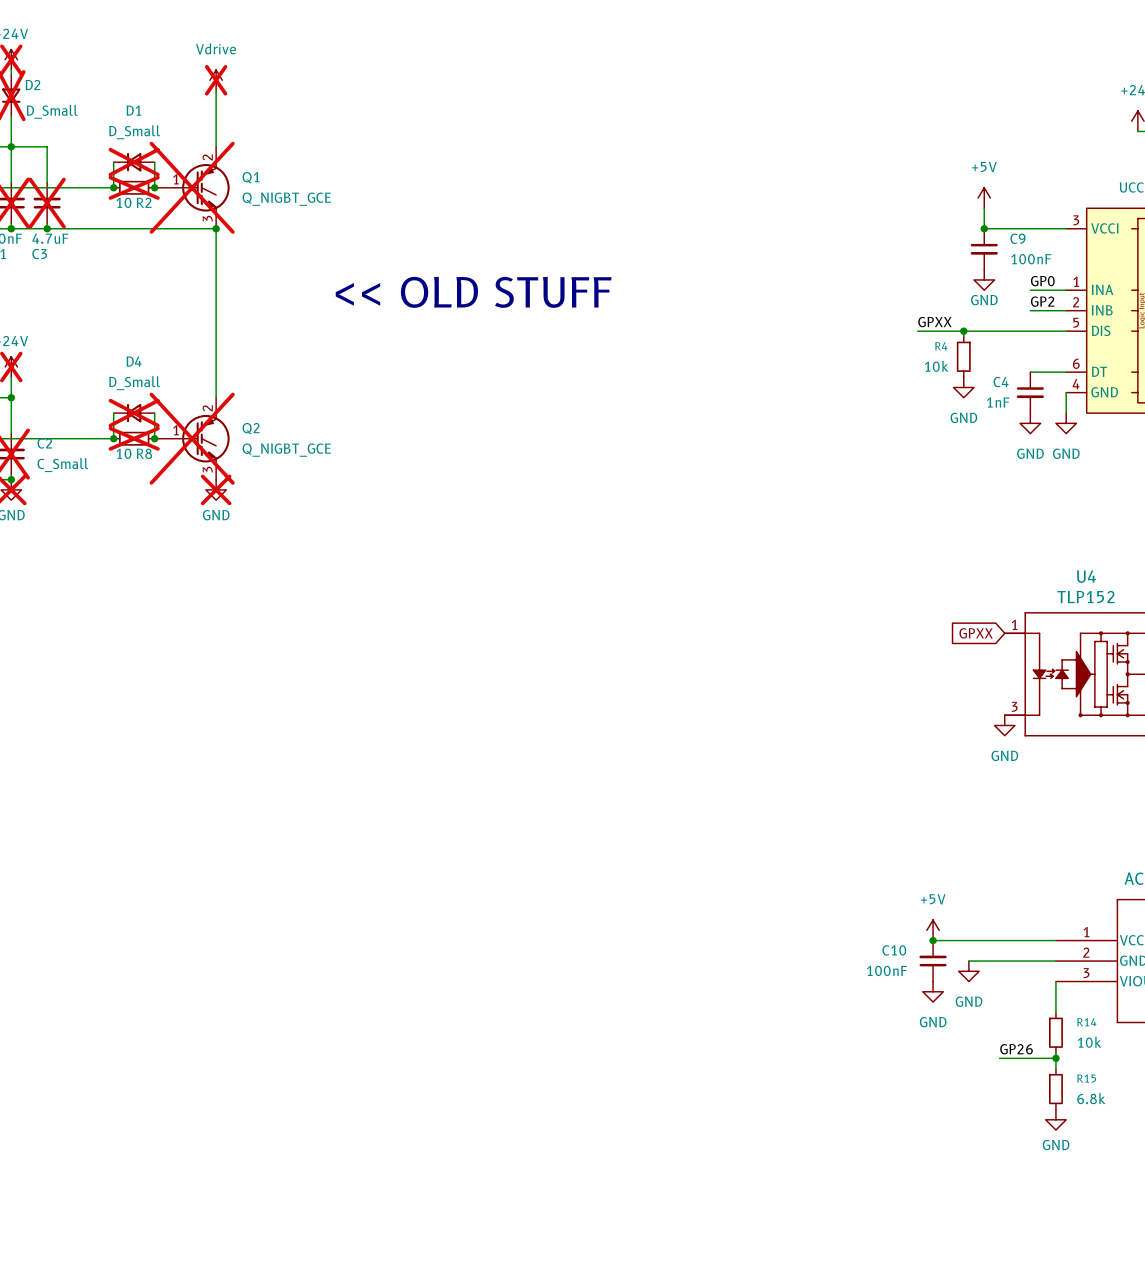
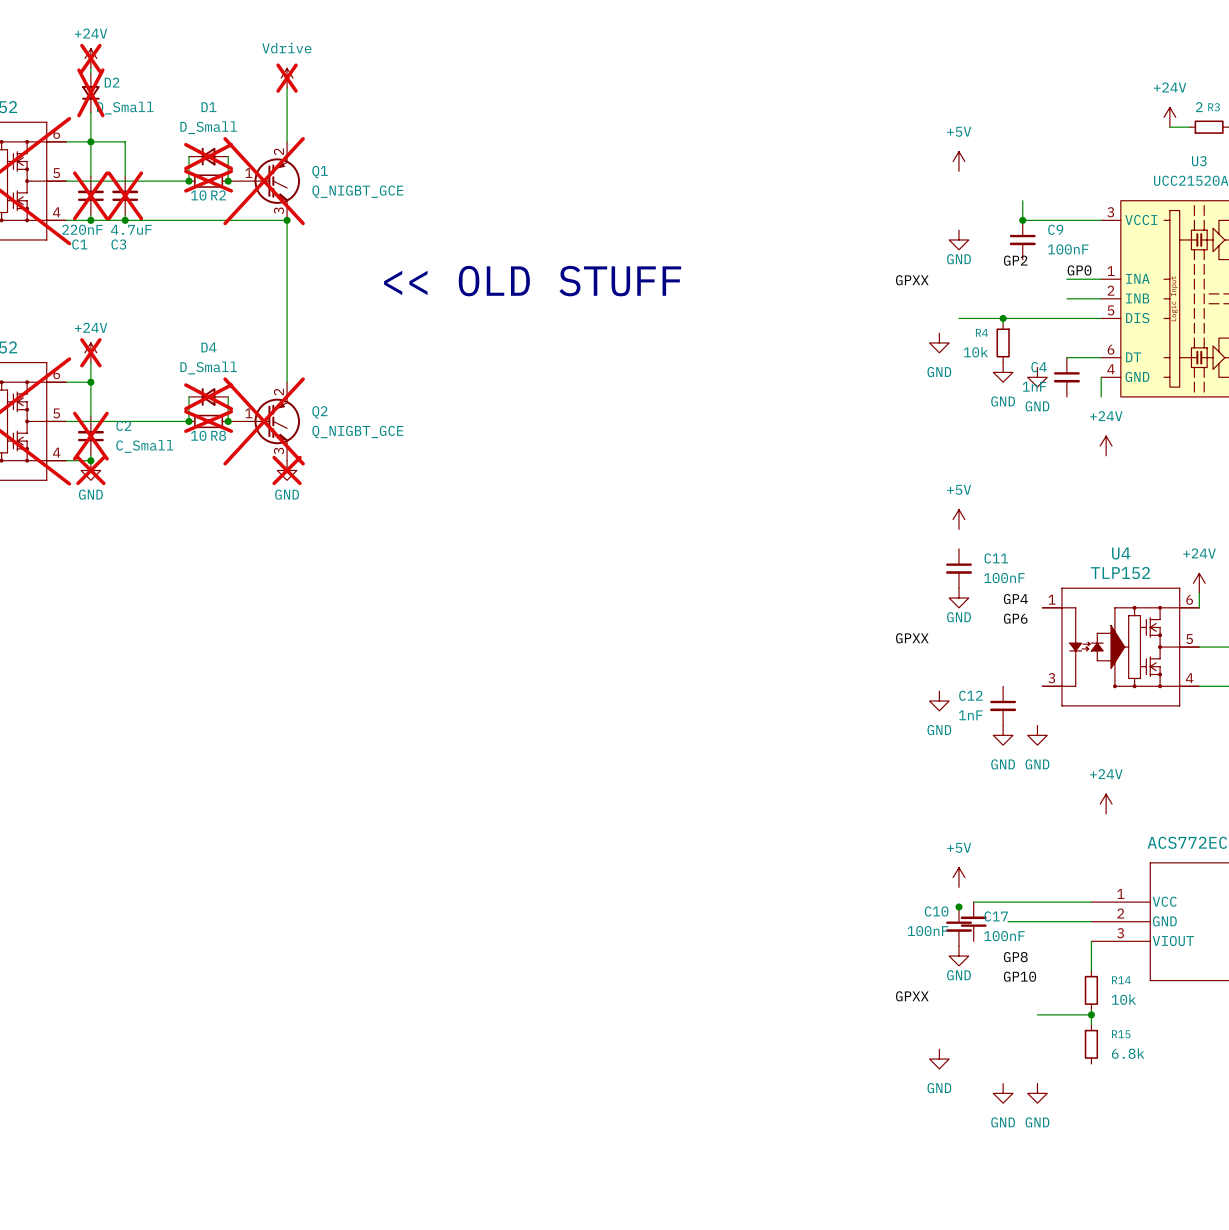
power symbol position: +5V (984, 198) -> +5V (958, 161)
power symbol: none -> GND (958, 239)
power symbol: GND (984, 279) -> none
label position: GP2 (1042, 301) -> GP2 (1015, 260)
label position: GPXX (934, 322) -> GPXX (912, 280)
power symbol: none -> GND (939, 342)
power symbol: none -> GND (1037, 377)
power symbol: GND (1030, 423) -> none
power symbol: GND (1066, 423) -> none
power symbol: none -> +24V (1106, 445)
power symbol: none -> +5V (958, 519)
C11: none -> 100nF (958, 568)
power symbol: none -> GND (958, 598)
label: none -> GP4 (1015, 599)
global label: GPXX (976, 633) -> none
label: none -> GP6 (1015, 618)
label: none -> GPXX (912, 638)
power symbol: GND (1004, 725) -> none
power symbol: none -> GND (939, 701)
C12: none -> 1nF (1003, 705)
power symbol: none -> GND (1003, 735)
power symbol: none -> GND (1037, 735)
power symbol: none -> +24V (1106, 804)
power symbol position: +5V (933, 930) -> +5V (958, 877)
junction position: (933, 940) -> (958, 906)
C17: none -> 100nF (958, 926)
power symbol: GND (968, 971) -> none
power symbol position: GND (933, 991) -> GND (958, 956)
label: none -> GP8 (1015, 957)
label: none -> GP10 (1019, 976)
power symbol text position: GND (933, 1022) -> GND (958, 975)
label: none -> GPXX (912, 996)
label: GP26 (1016, 1049) -> none
power symbol: none -> GND (939, 1059)
power symbol: GND (1055, 1119) -> none
power symbol: none -> GND (1003, 1093)
power symbol: none -> GND (1037, 1093)

